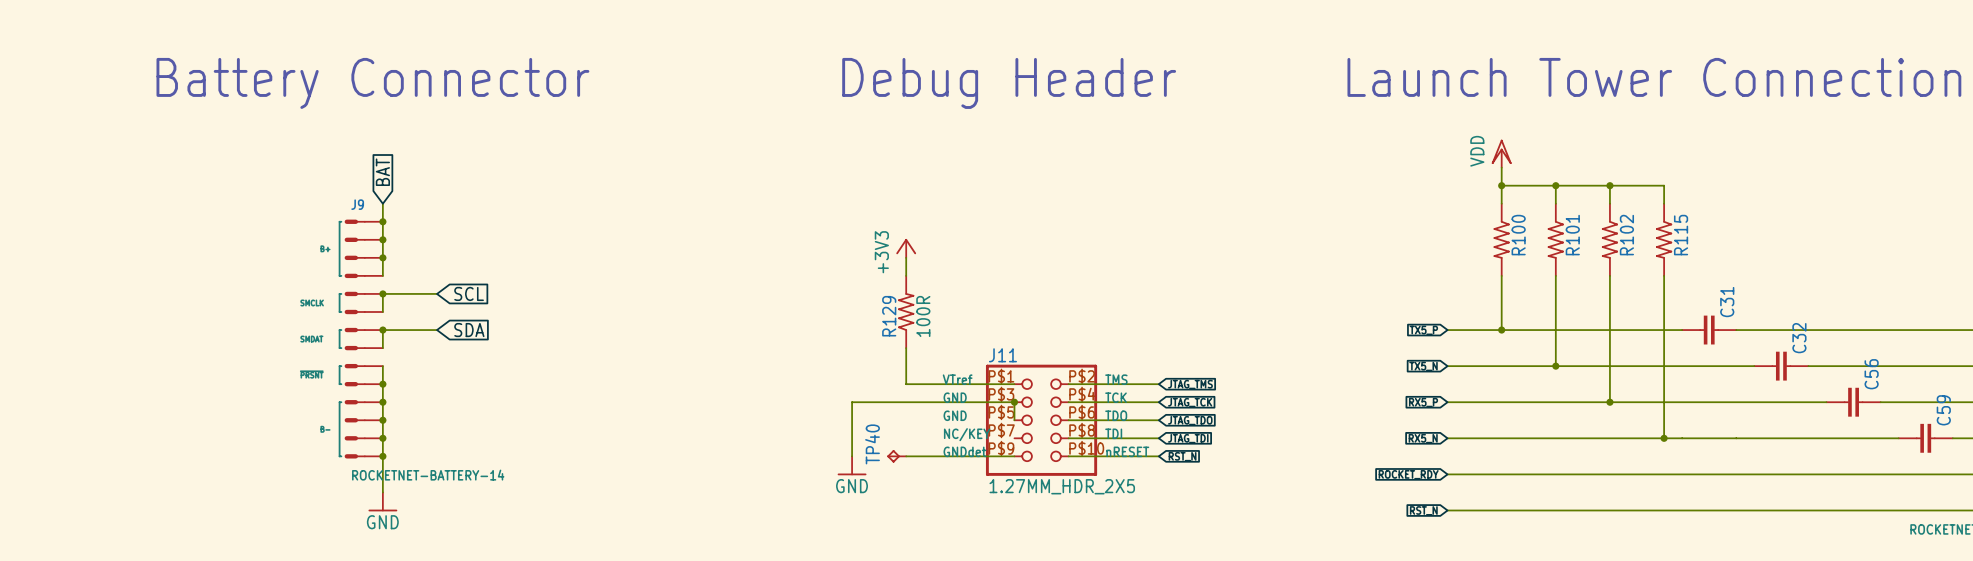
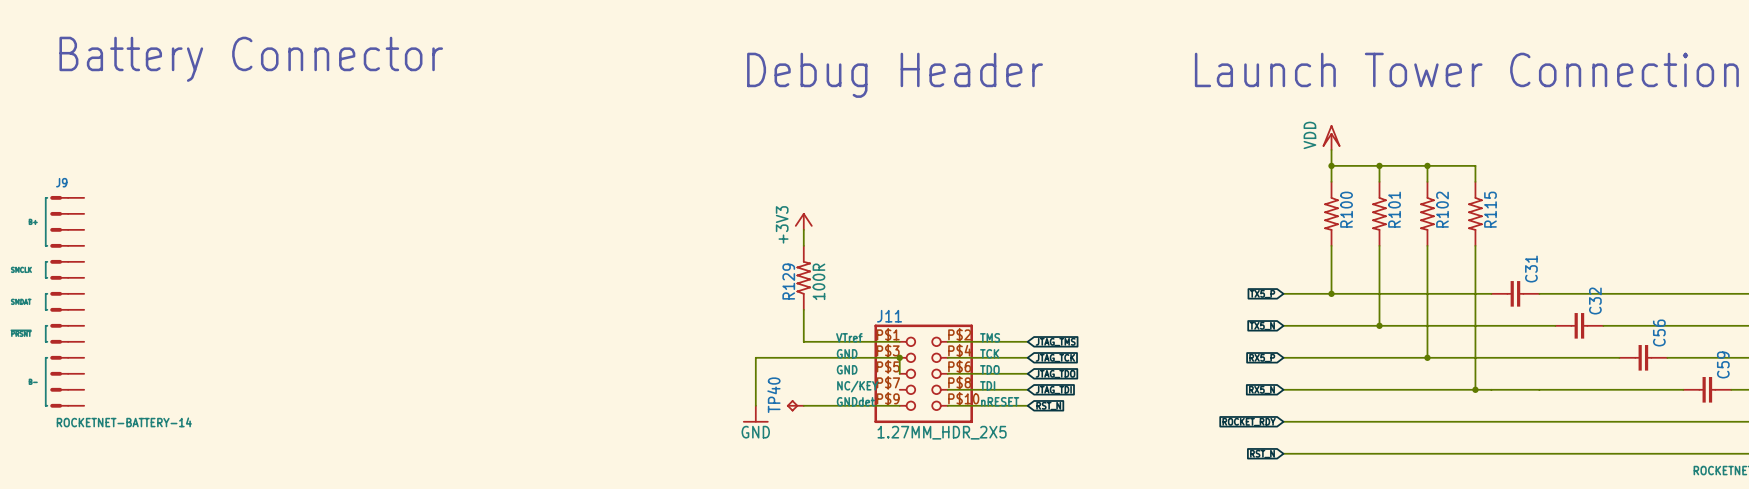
text position: Battery Connector (372, 83) -> Battery Connector (251, 59)
global label: BAT (382, 172) -> none
wire: (382, 203) (382, 275) -> none
junction: (382, 221) -> none
junction: (382, 239) -> none
junction: (382, 257) -> none
junction: (382, 293) -> none
wire: (437, 293) (382, 293) (382, 312) -> none
global label: SCL (469, 293) -> none
junction: (382, 330) -> none
wire: (437, 330) (382, 330) (382, 348) -> none
global label: SDA (469, 330) -> none
J9 position: (360, 339) -> (64, 301)
wire: (382, 366) (382, 492) -> none
junction: (382, 384) -> none
junction: (382, 402) -> none
junction: (382, 420) -> none
junction: (382, 438) -> none
junction: (382, 456) -> none
power symbol: GND (382, 501) -> none

